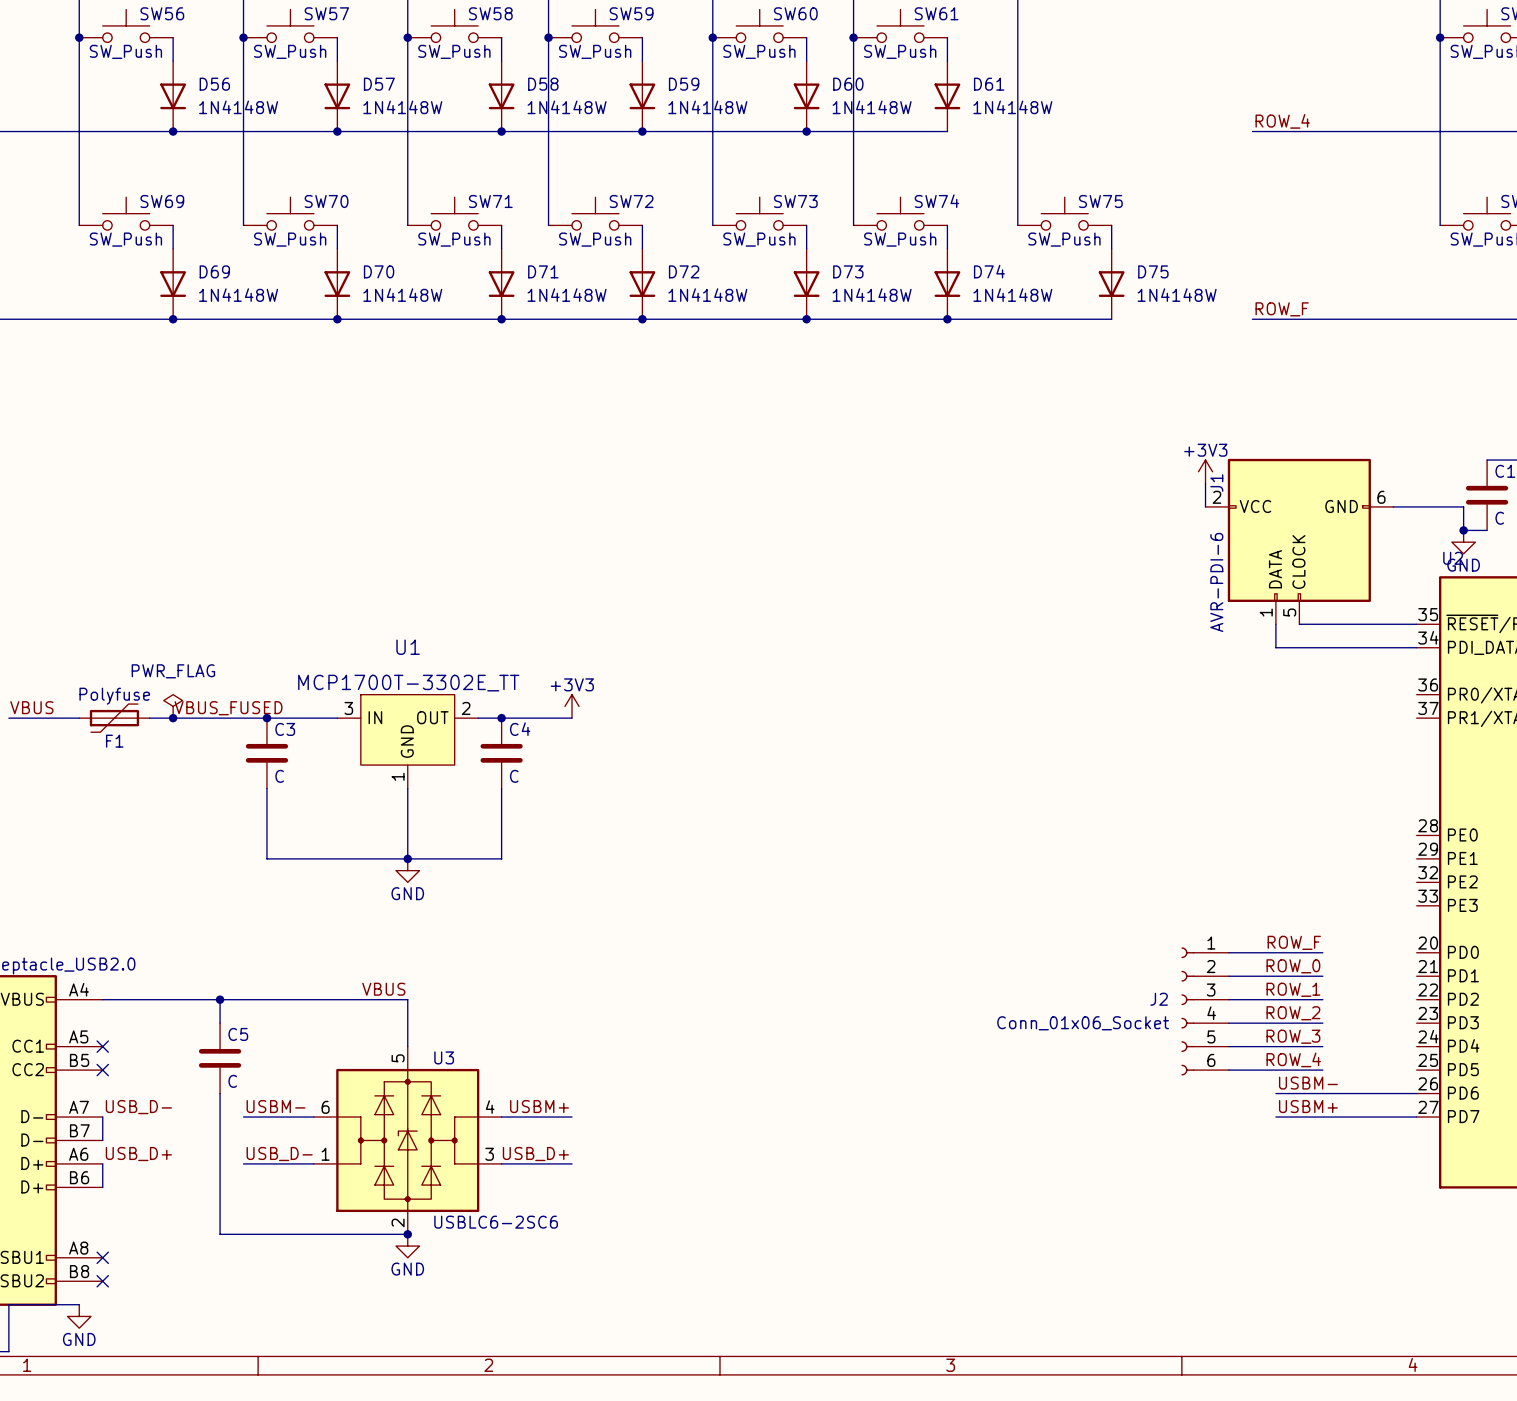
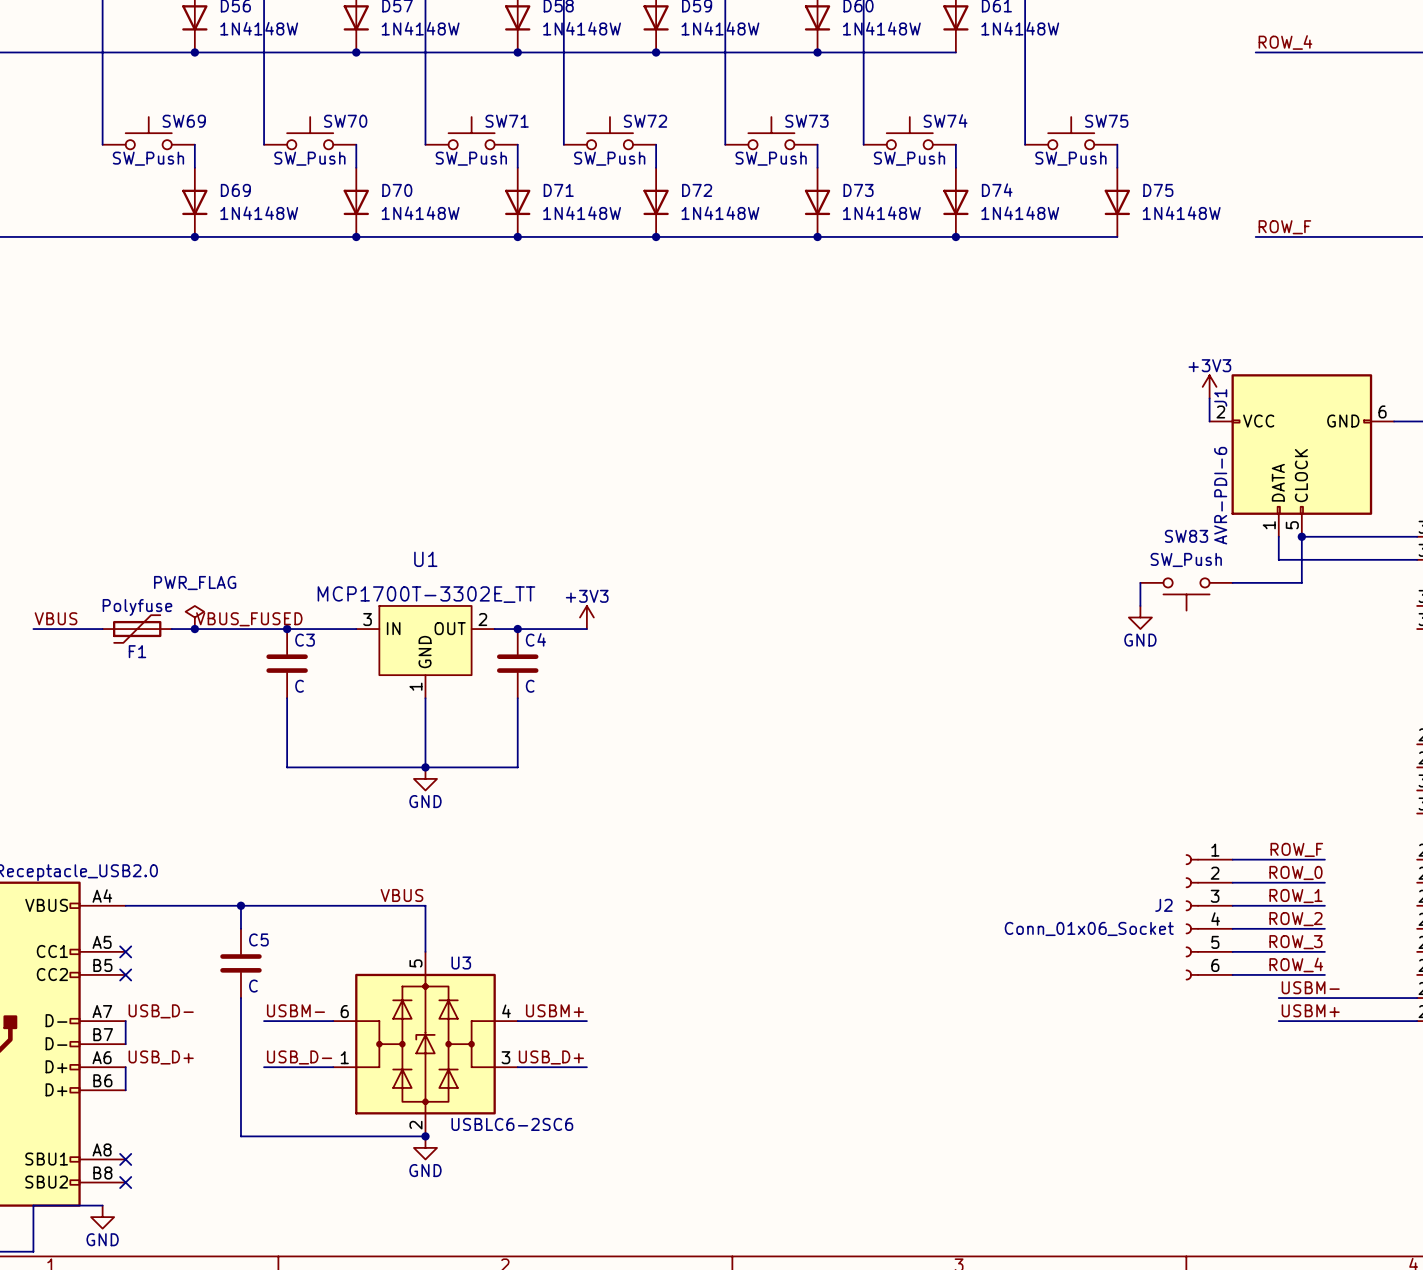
wire: none -> (1301, 536) (1301, 582) (1232, 582)
junction: none -> (1301, 536)
wire: none -> (1140, 582) (1140, 605)
SW83: none -> SW_Push (1186, 594)
power symbol: none -> GND (1140, 617)

